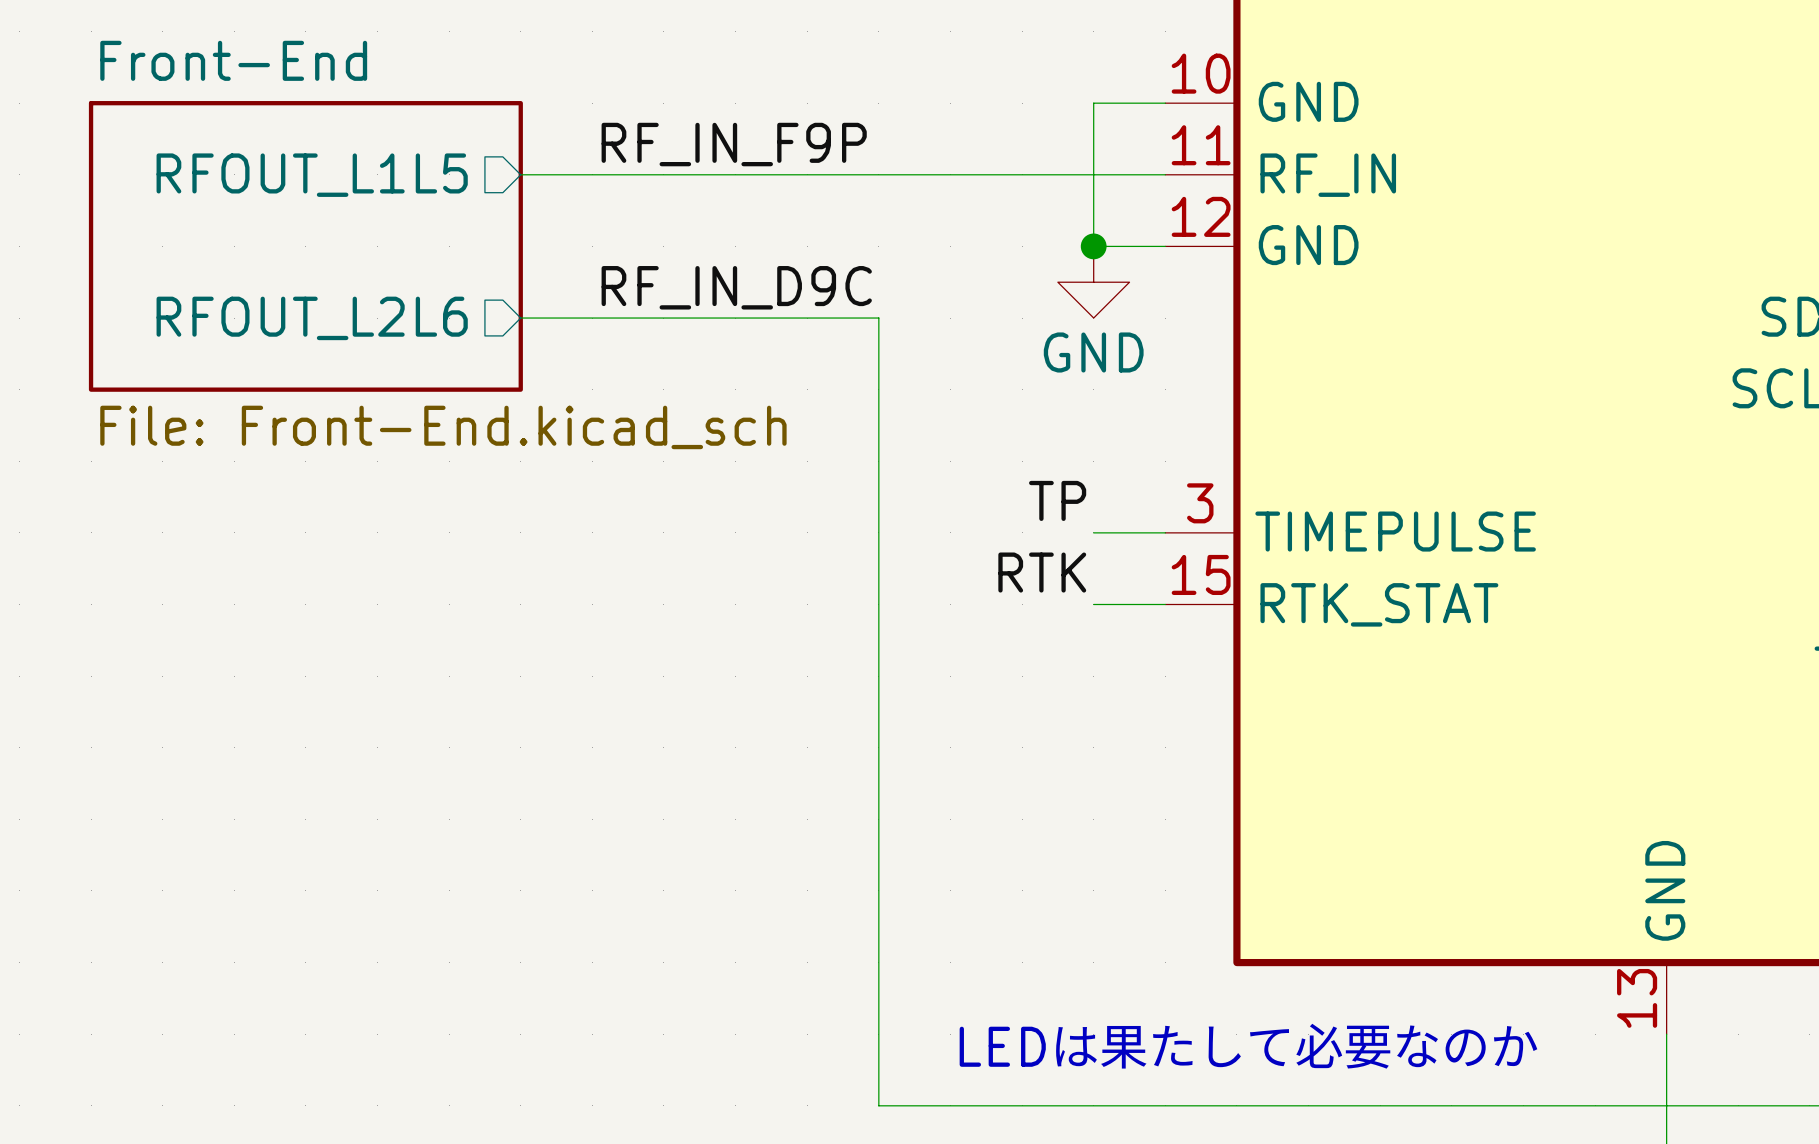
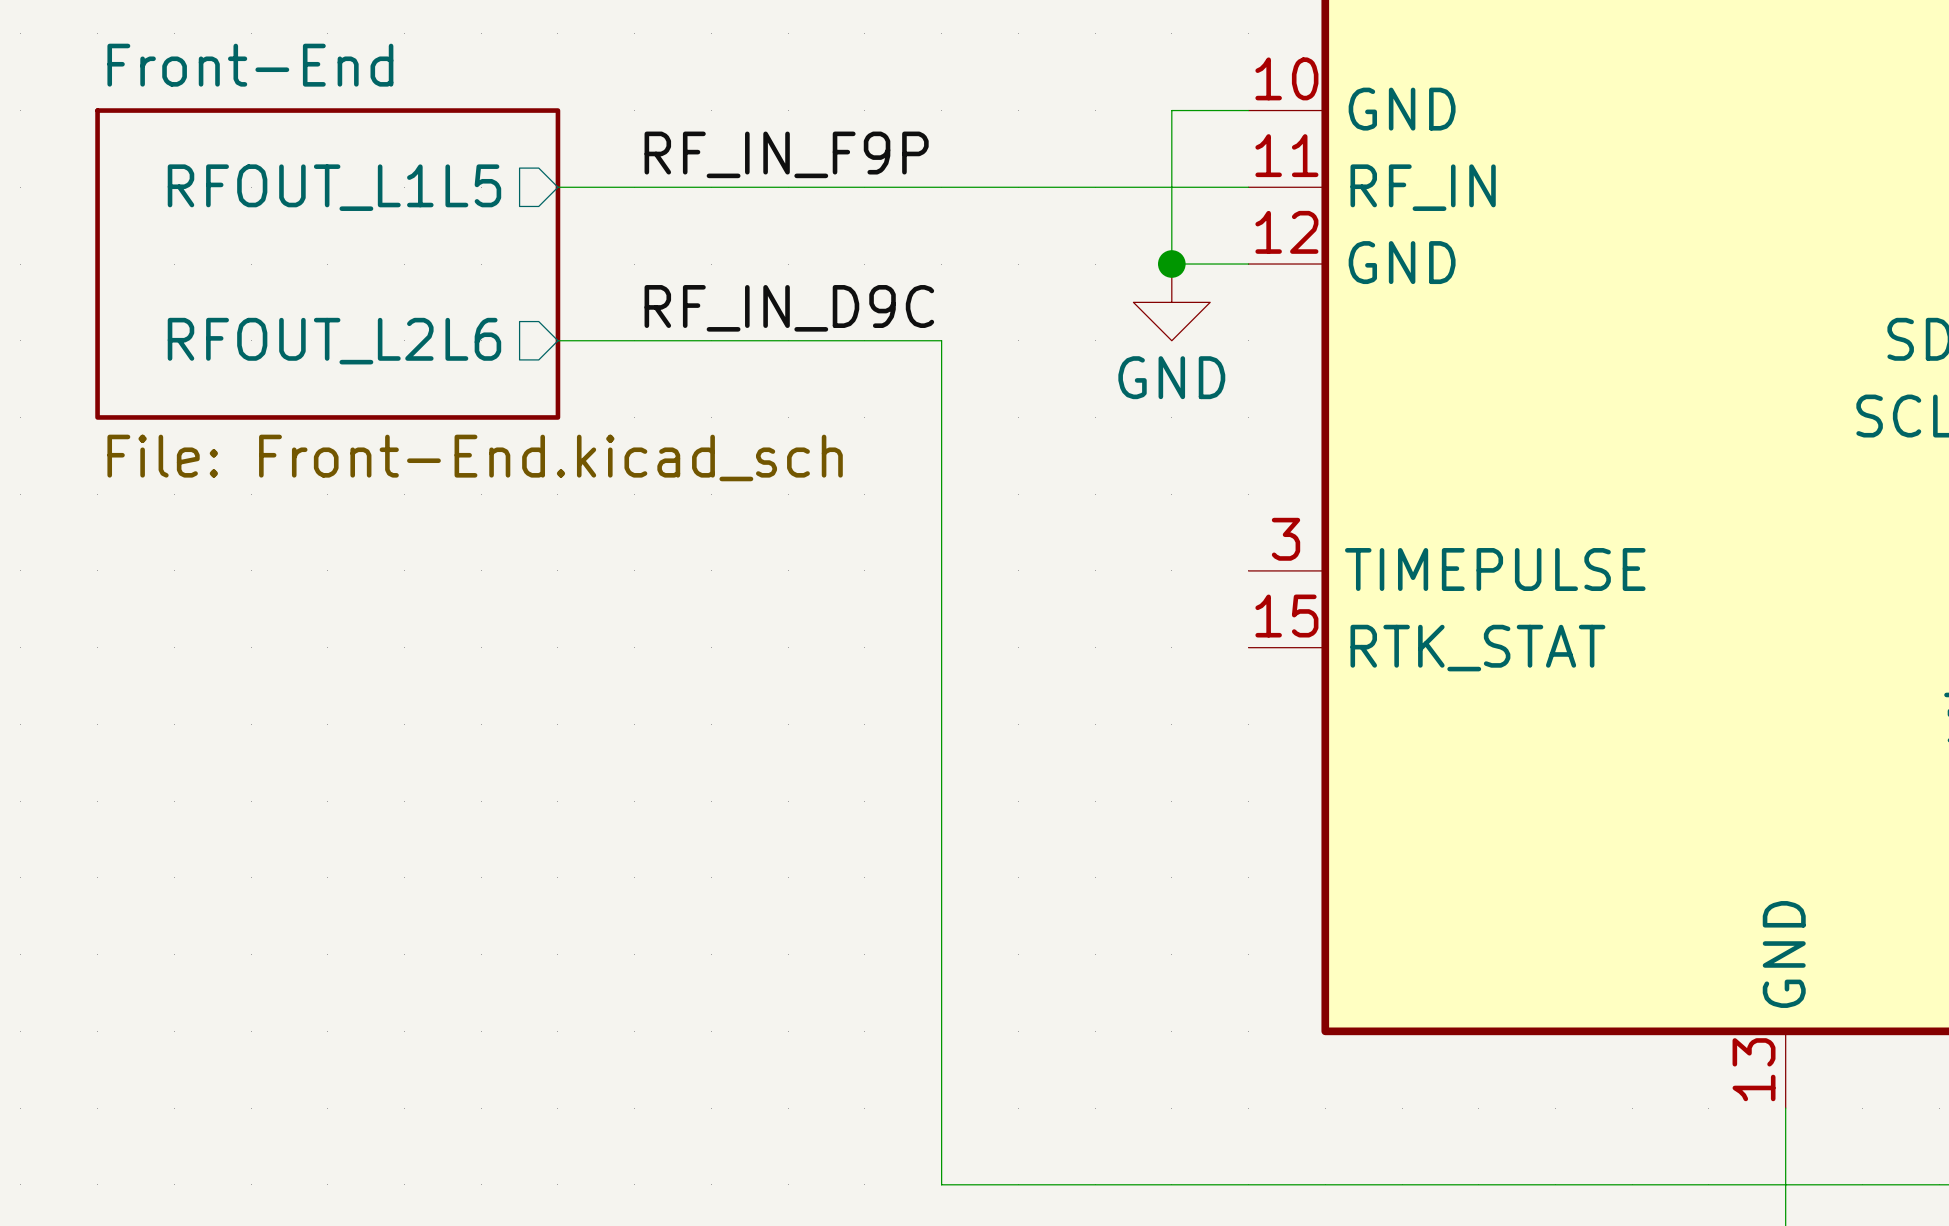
label: TP (1057, 500) -> none
wire: (1093, 532) (1165, 532) -> none
label: RTK (1042, 572) -> none
wire: (1093, 604) (1165, 604) -> none
text: LEDは果たして必要なのか (1249, 1046) -> none

